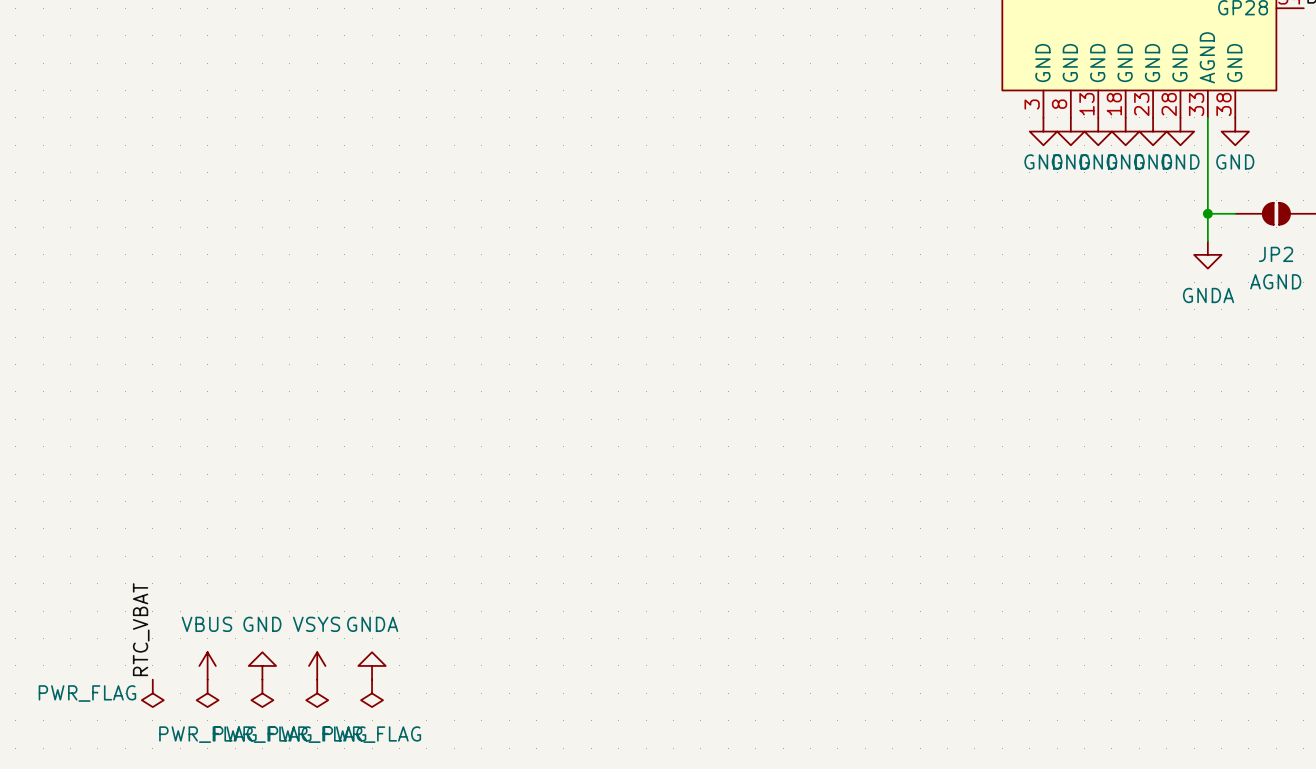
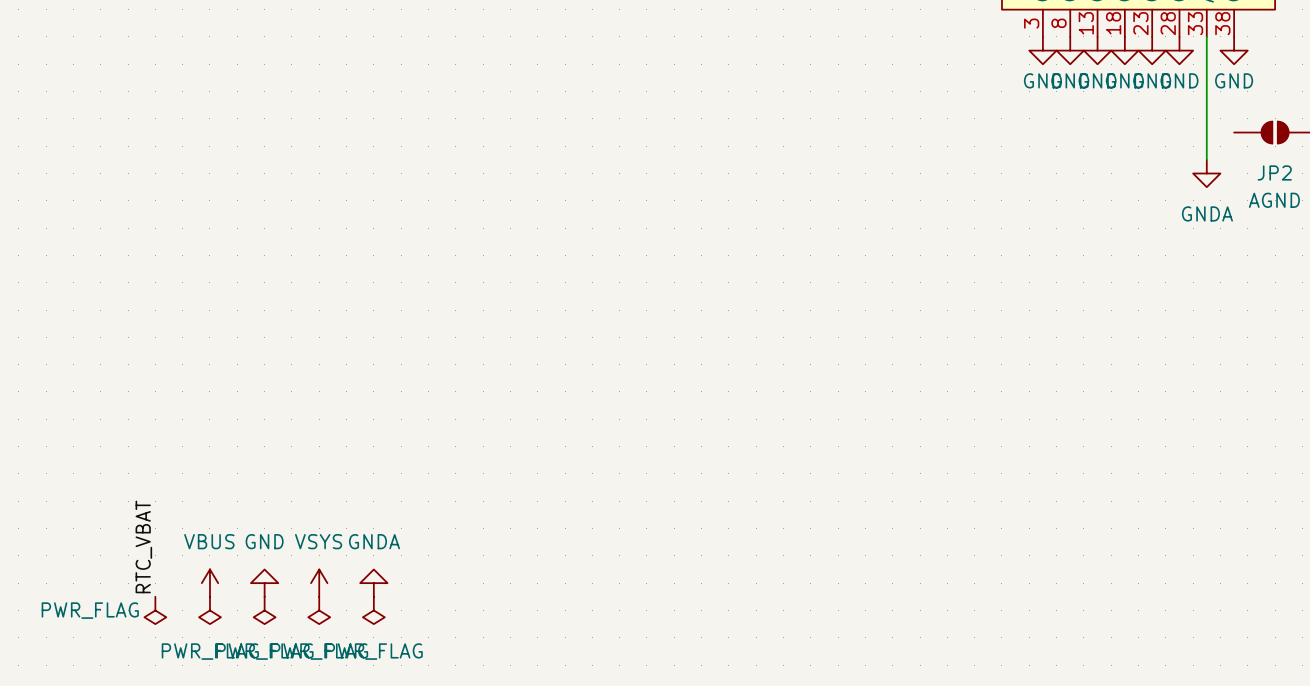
wire: (1207, 213) (1235, 213) -> none
junction: (1207, 213) -> none

